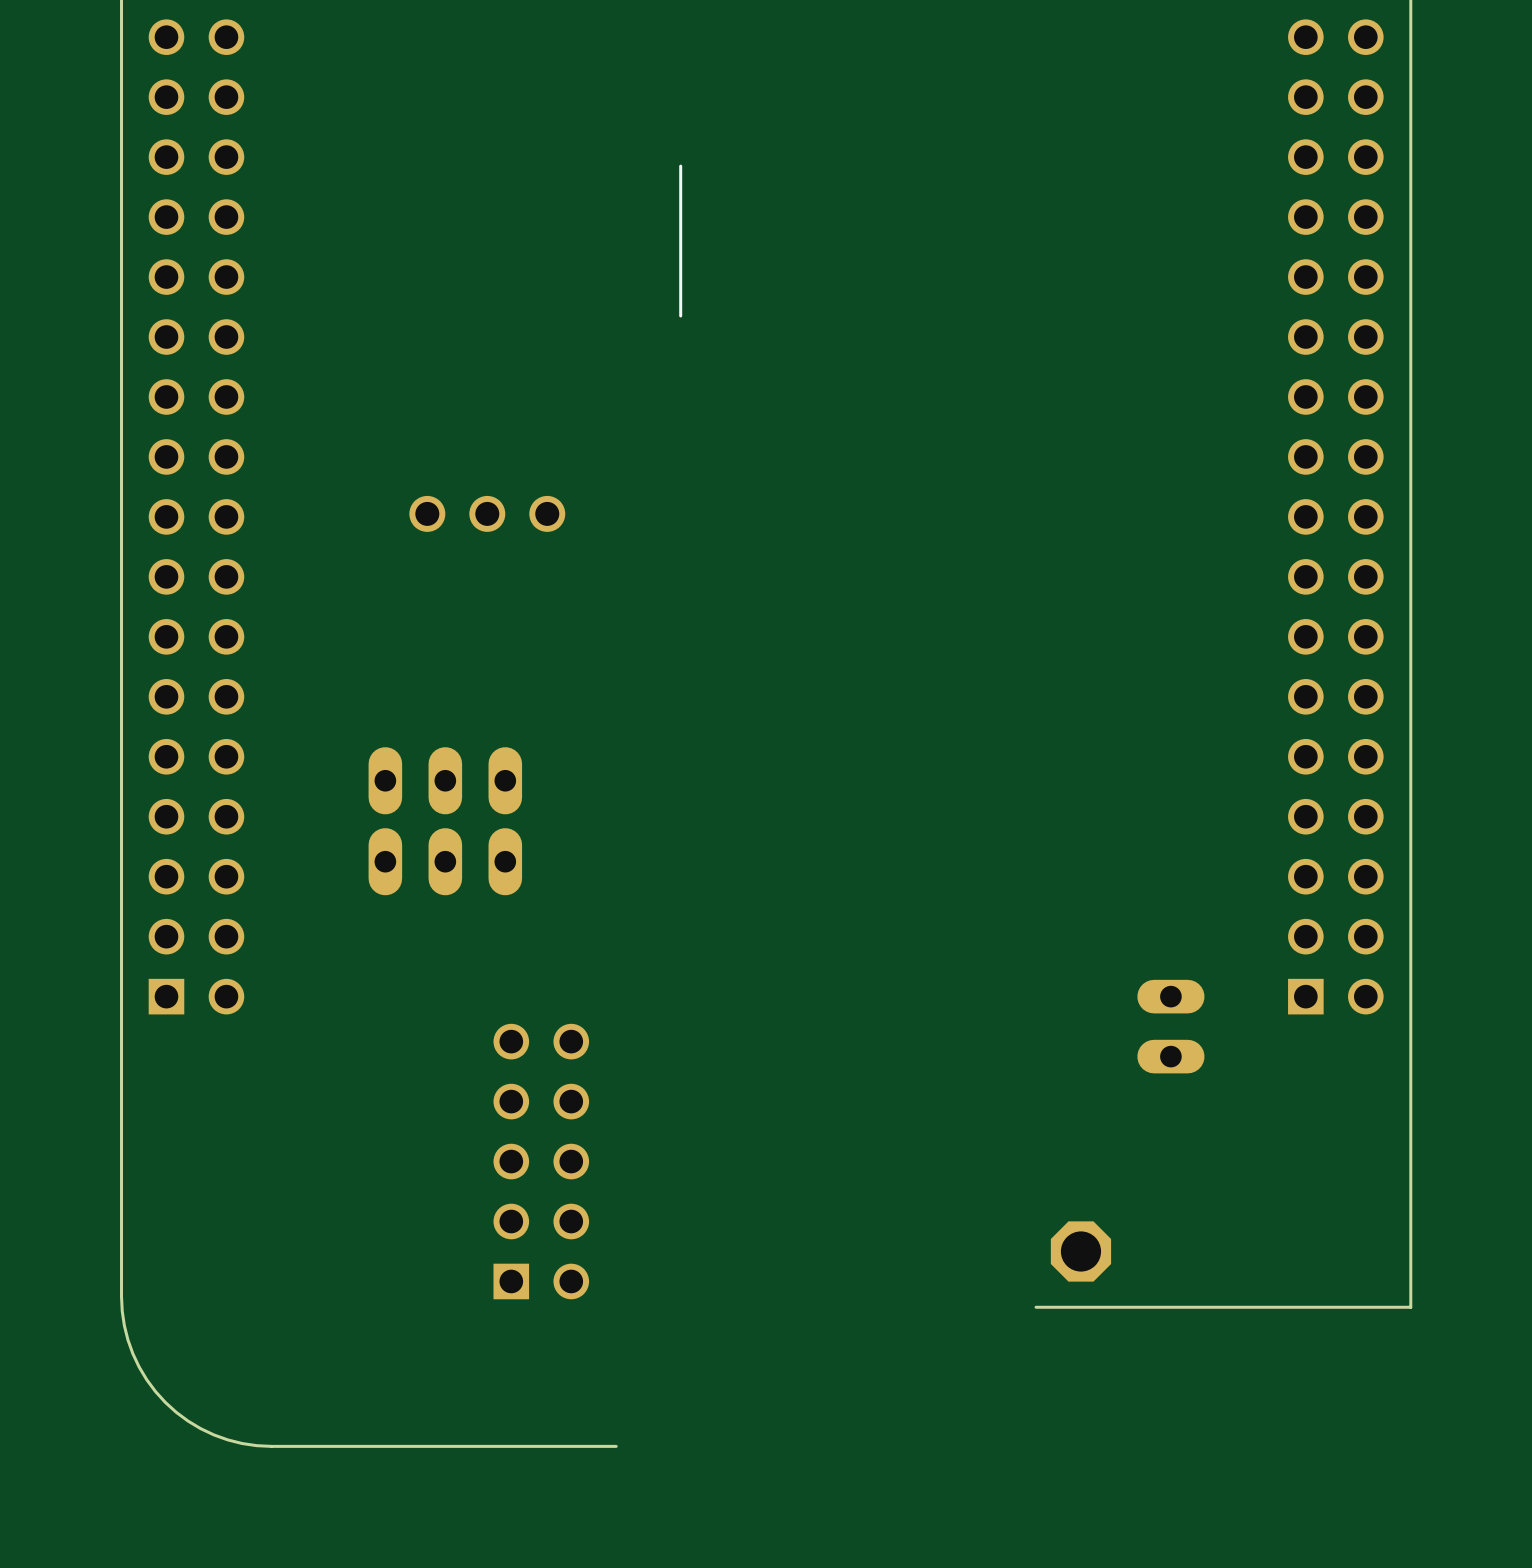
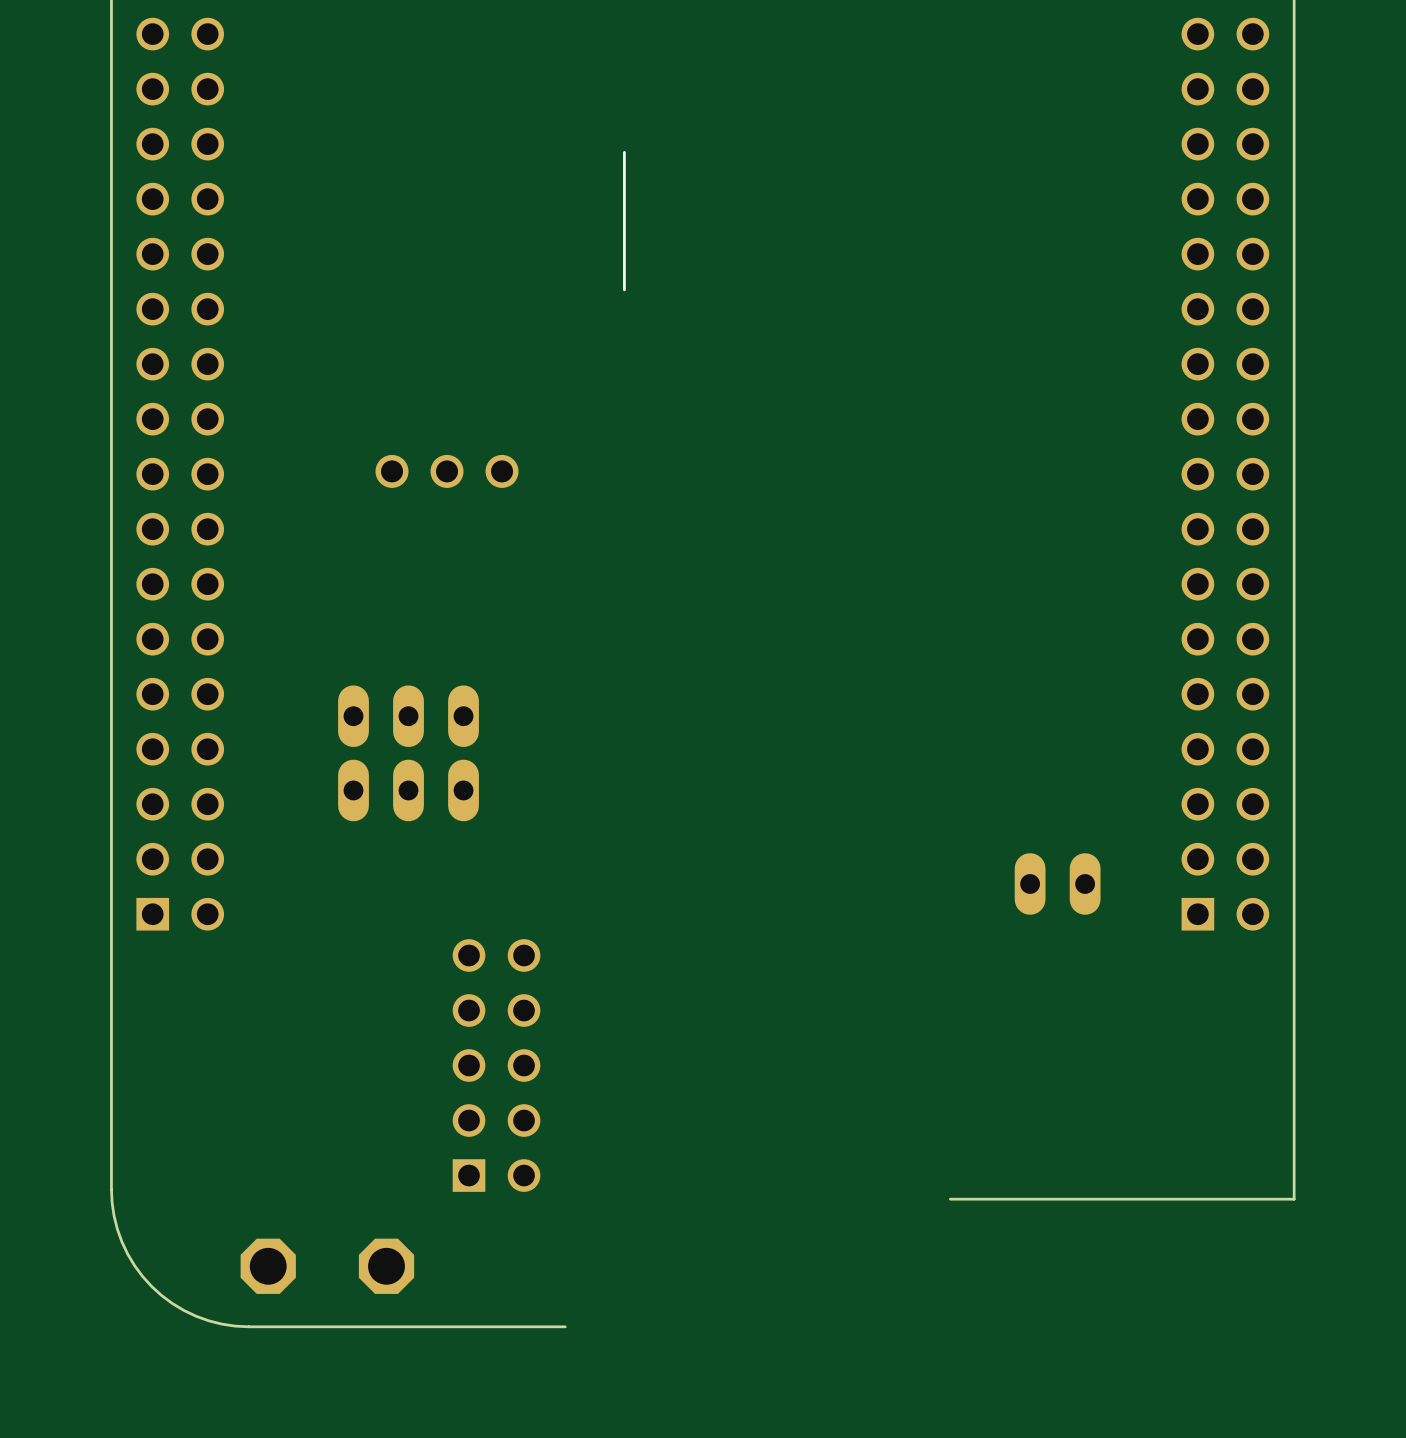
part rotation: 0° (1170, 1026) -> 90° clockwise (1057, 883)
part position: (1170, 1026) -> (1057, 883)
part: (1080, 1251) -> none
part: none -> (268, 1266)
part: none -> (386, 1266)

